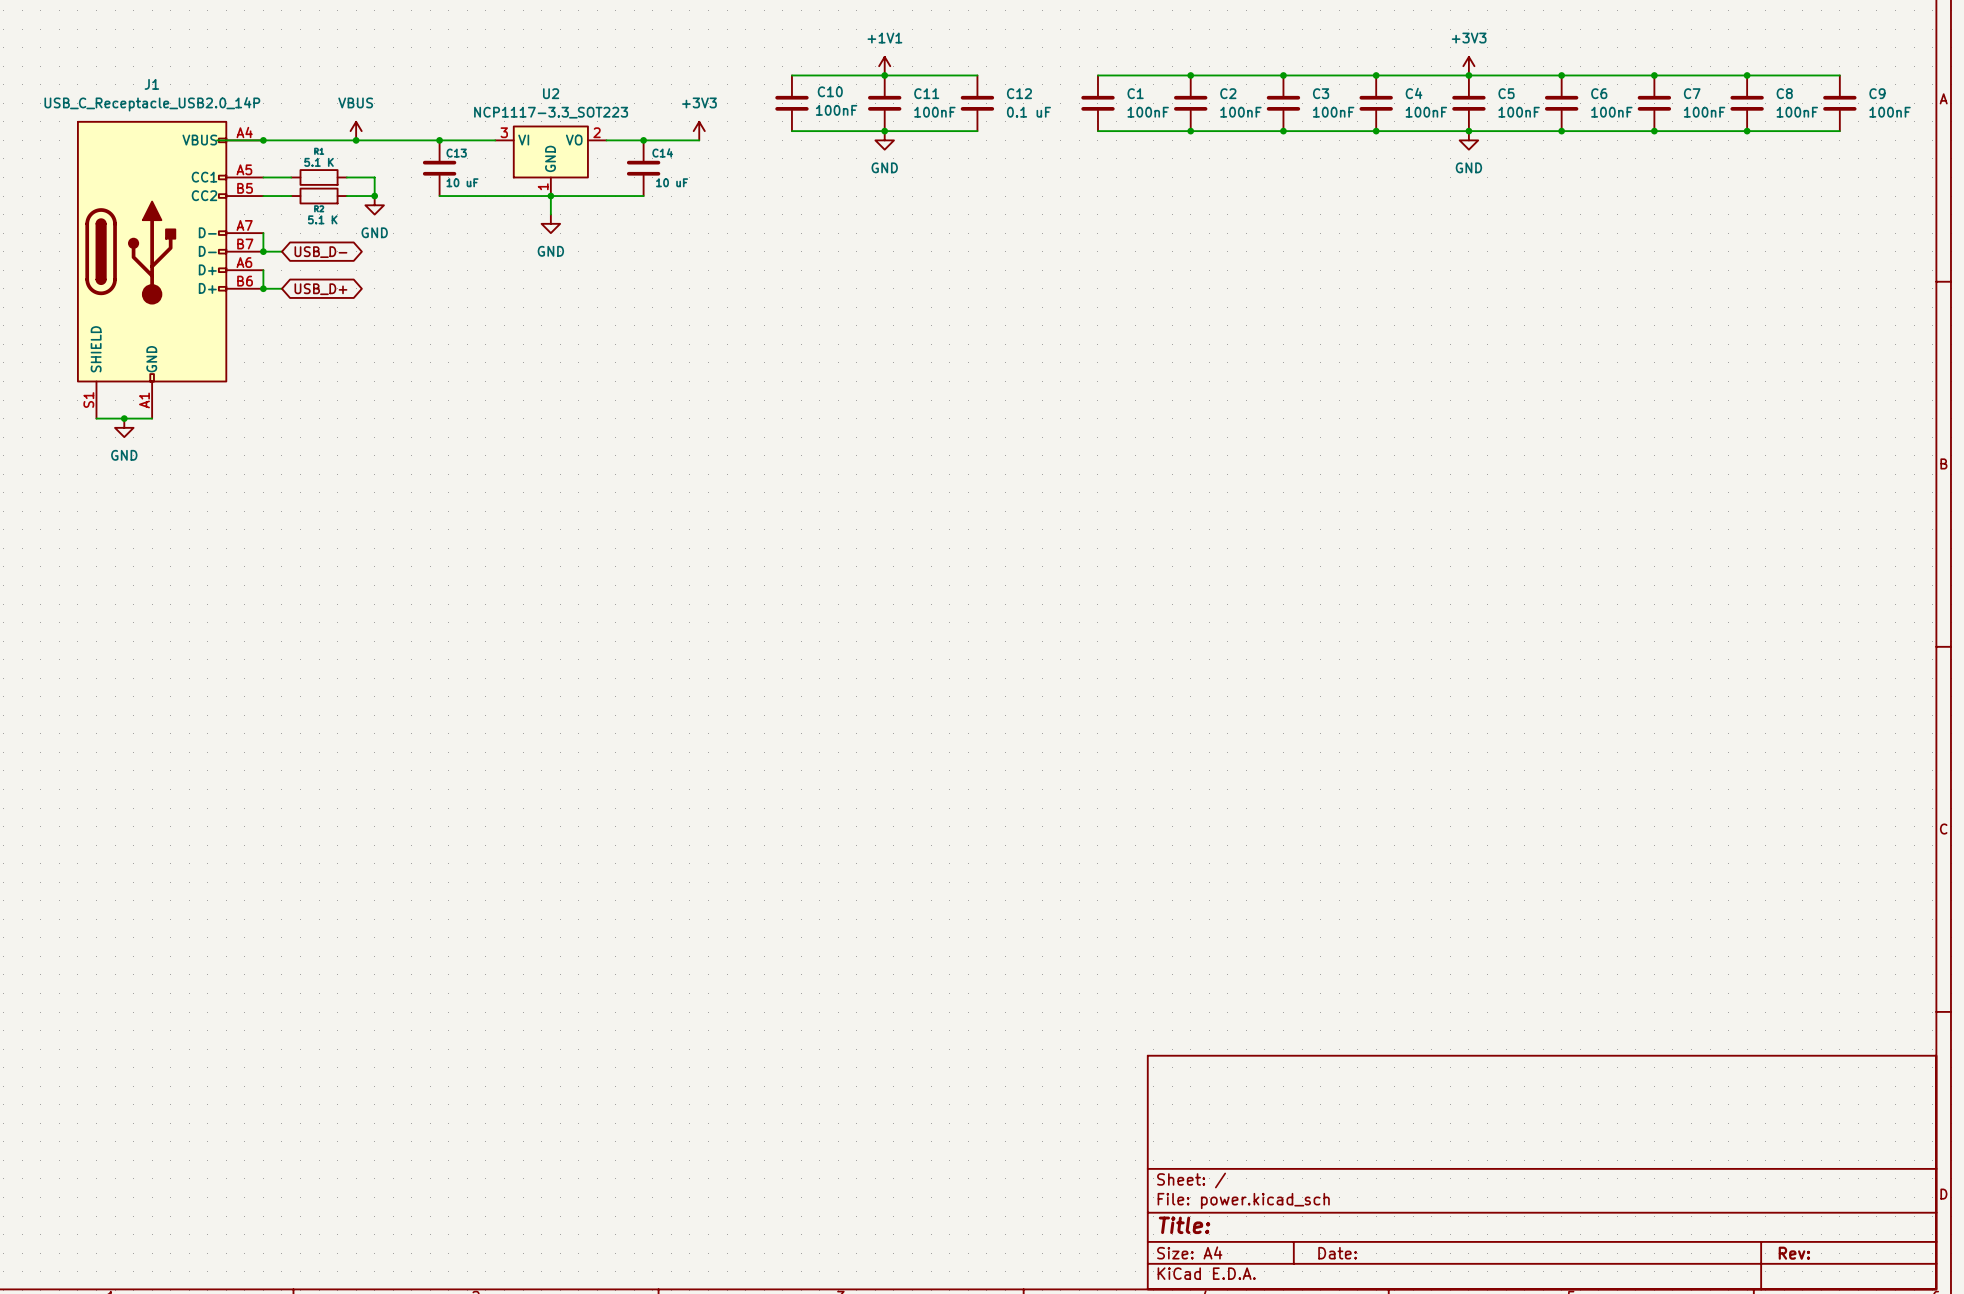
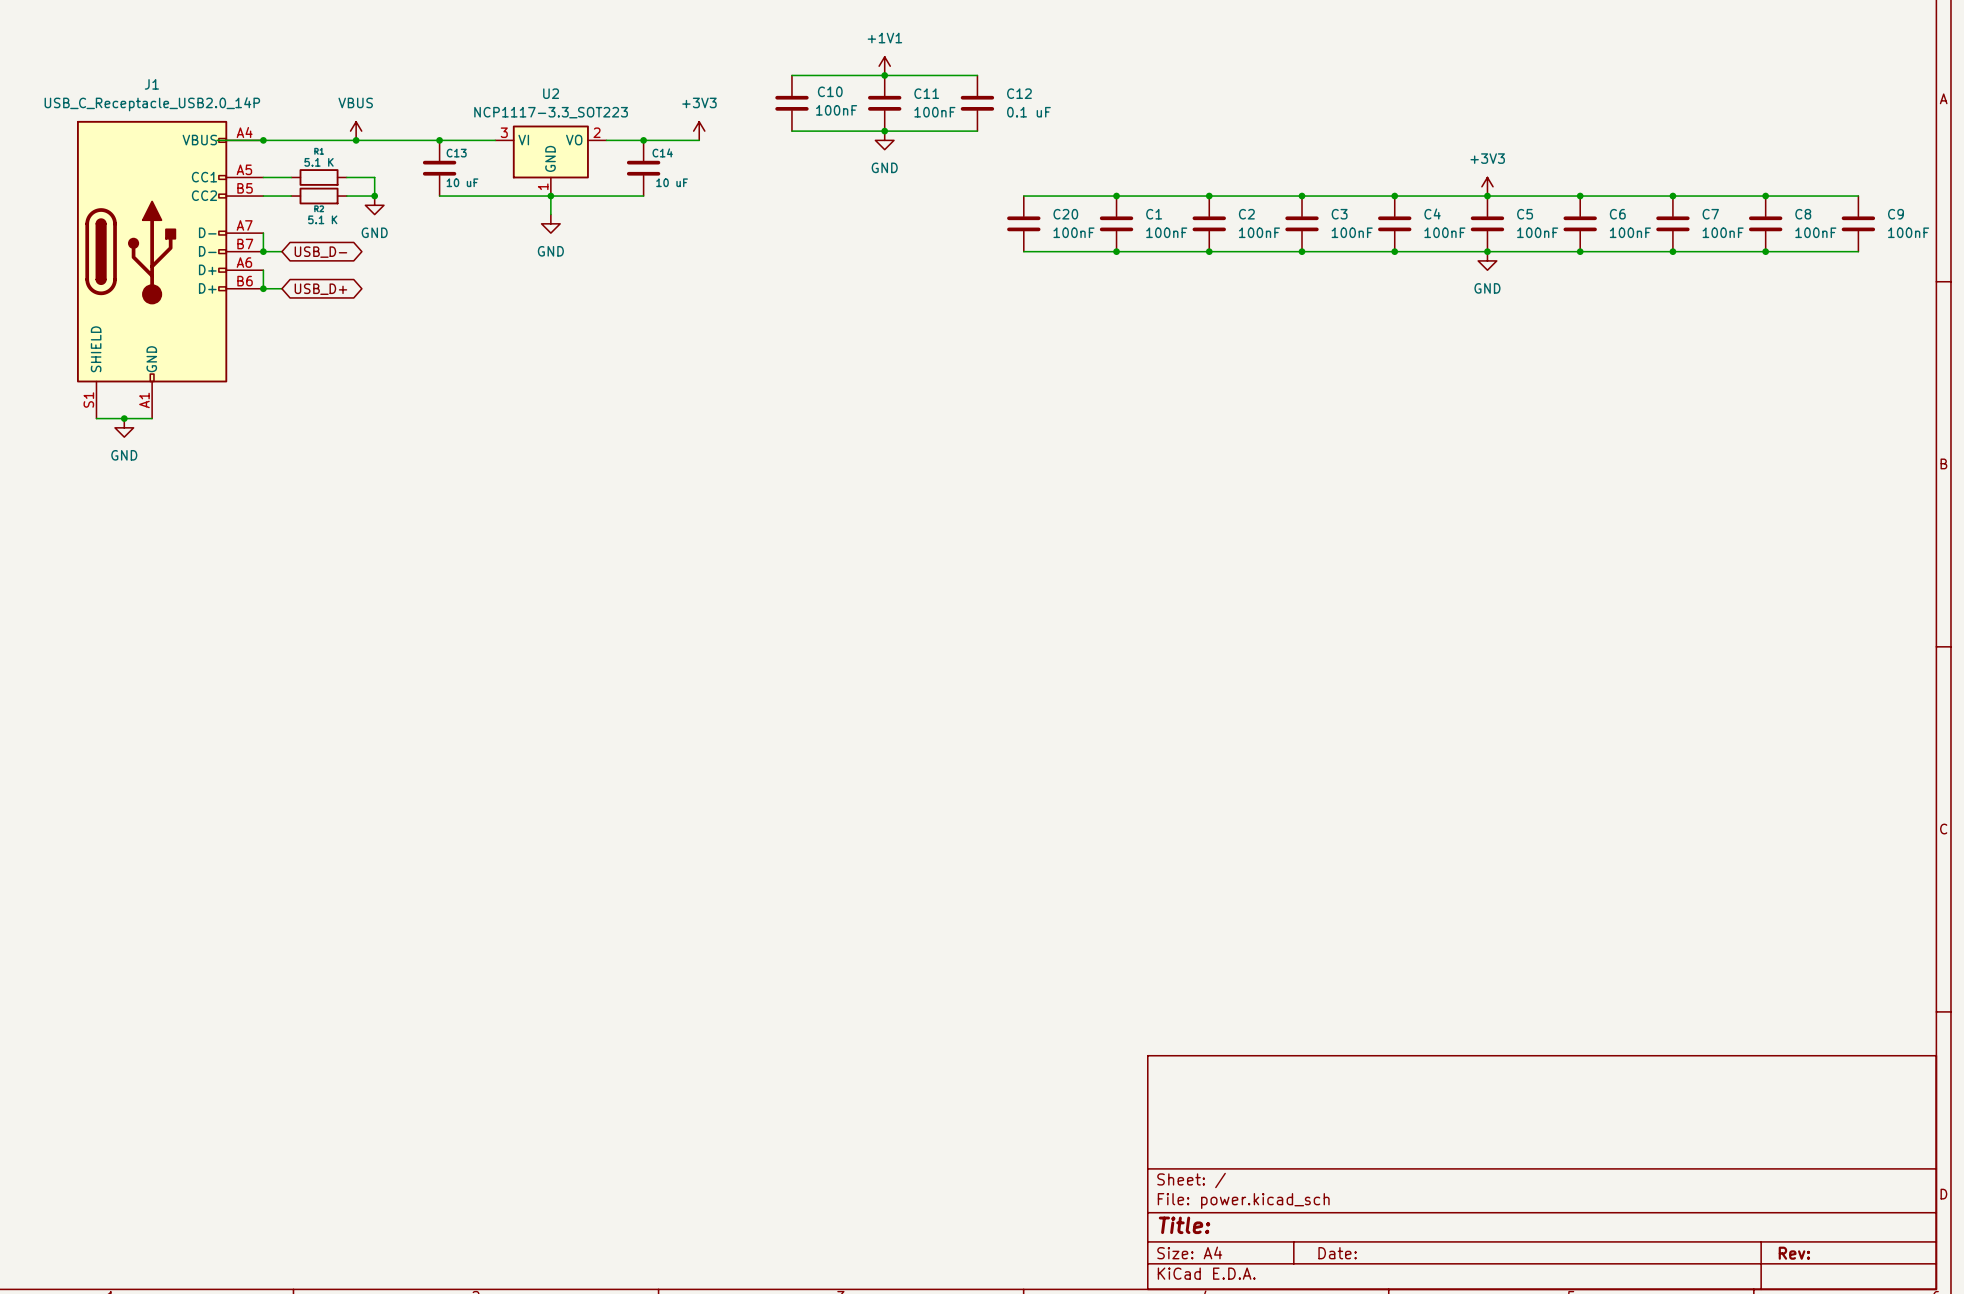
power symbol position: +3V3 (1468, 66) -> +3V3 (1487, 186)
wire: (1097, 75) (1839, 75) -> none
junction: (1190, 75) -> none
junction: (1283, 75) -> none
junction: (1376, 75) -> none
junction: (1468, 75) -> none
junction: (1561, 75) -> none
junction: (1654, 75) -> none
junction: (1747, 75) -> none
C1 position: (1097, 103) -> (1116, 223)
C2 position: (1190, 103) -> (1209, 223)
C3 position: (1283, 103) -> (1302, 223)
C4 position: (1376, 103) -> (1394, 223)
C5 position: (1468, 103) -> (1487, 223)
C6 position: (1561, 103) -> (1580, 223)
C7 position: (1654, 103) -> (1672, 223)
C8 position: (1747, 103) -> (1765, 223)
C9 position: (1839, 103) -> (1858, 223)
wire: (1097, 131) (1839, 131) -> none
junction: (1190, 131) -> none
junction: (1283, 131) -> none
junction: (1376, 131) -> none
junction: (1468, 131) -> none
junction: (1561, 131) -> none
junction: (1654, 131) -> none
junction: (1747, 131) -> none
power symbol position: GND (1468, 140) -> GND (1487, 260)
wire: none -> (1023, 196) (1858, 196)
junction: none -> (1116, 196)
junction: none -> (1209, 196)
junction: none -> (1302, 196)
junction: none -> (1394, 196)
junction: none -> (1487, 196)
junction: none -> (1580, 196)
junction: none -> (1672, 196)
junction: none -> (1765, 196)
C20: none -> 100nF (1023, 223)
wire: none -> (1023, 251) (1858, 251)
junction: none -> (1116, 251)
junction: none -> (1209, 251)
junction: none -> (1302, 251)
junction: none -> (1394, 251)
junction: none -> (1487, 251)
junction: none -> (1580, 251)
junction: none -> (1672, 251)
junction: none -> (1765, 251)

